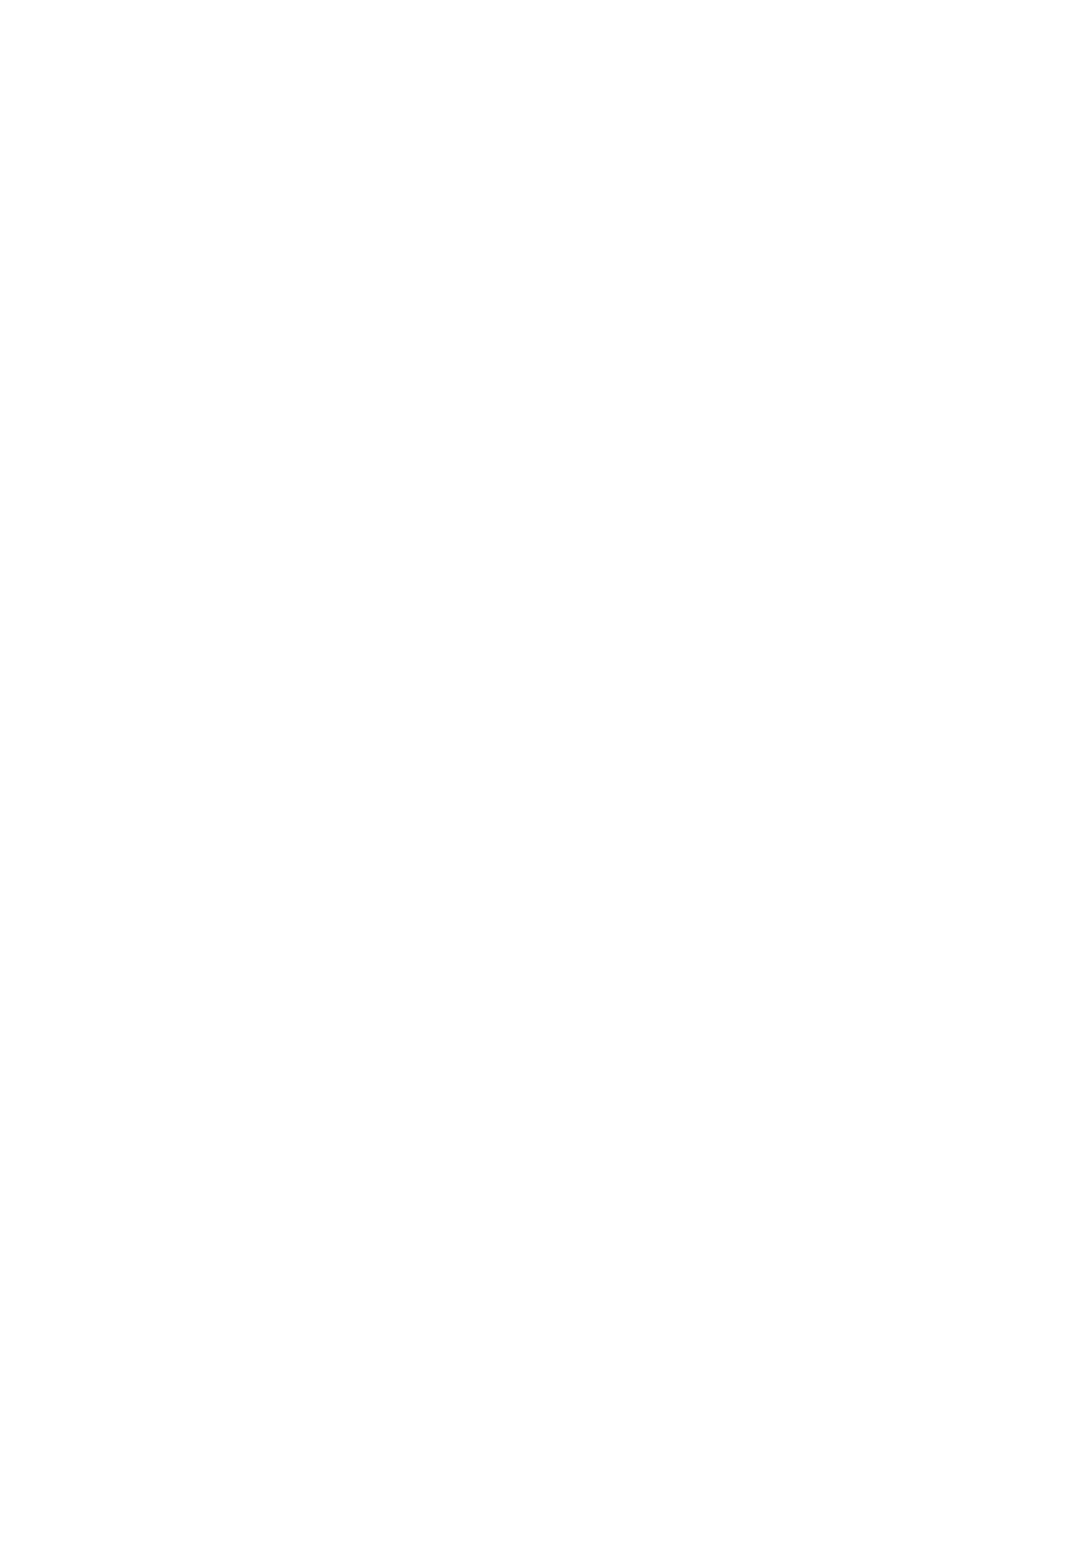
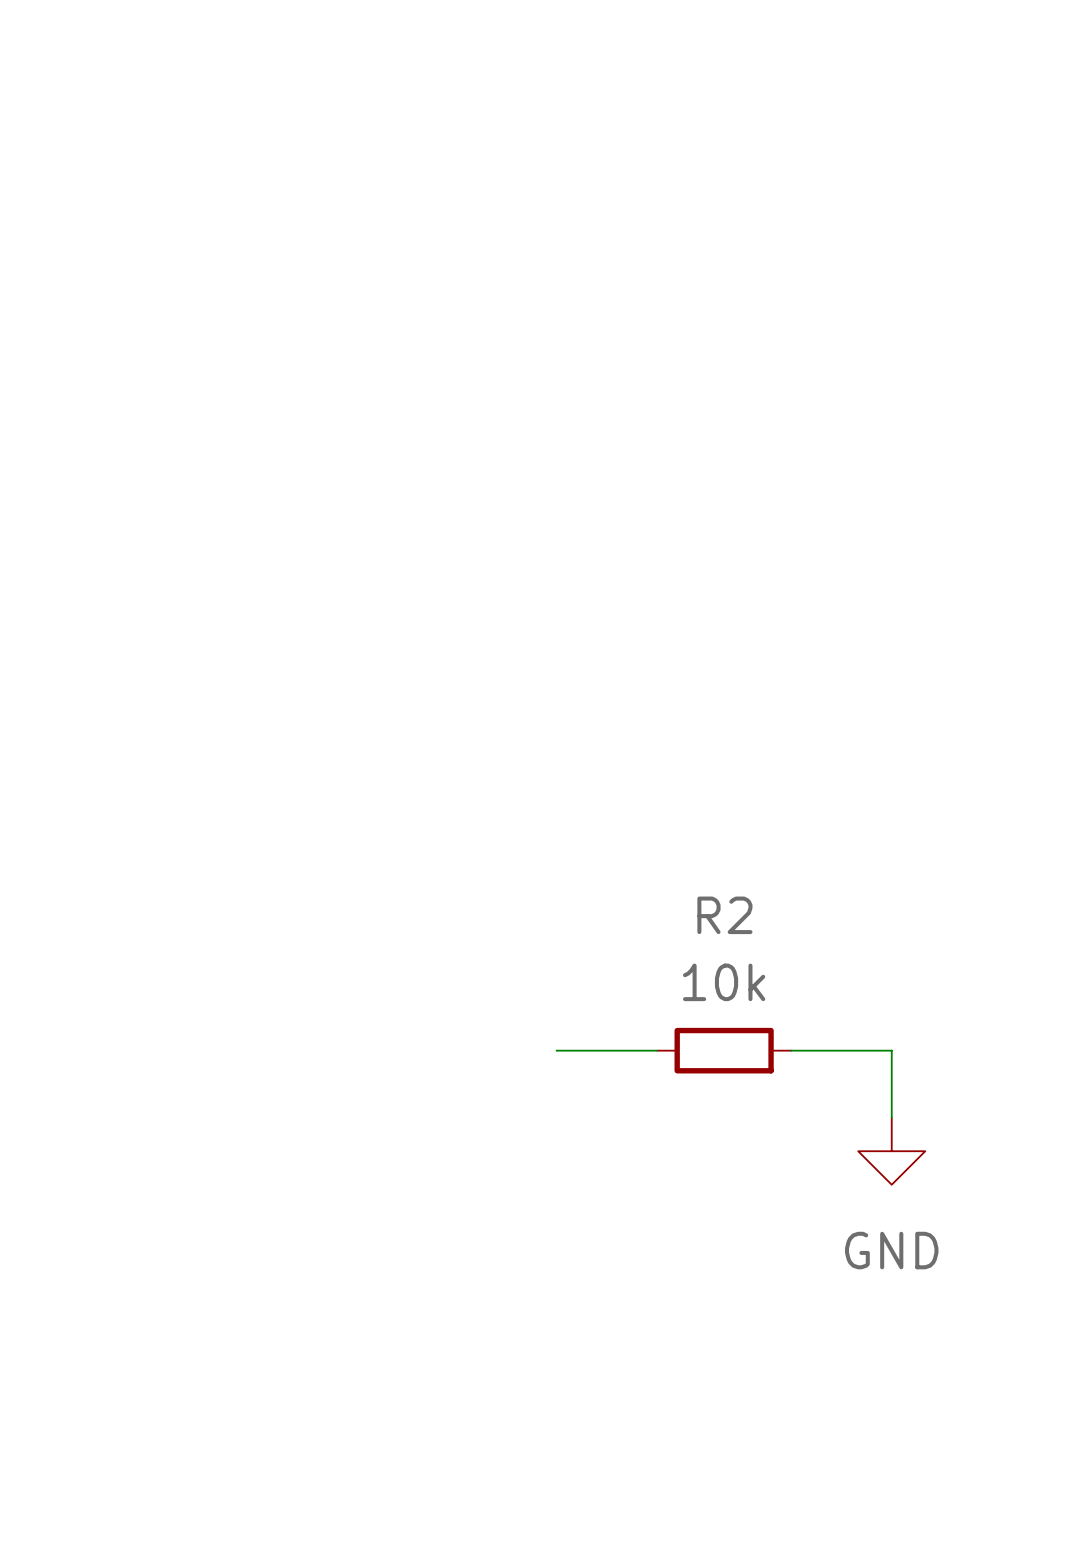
wire: none -> (556, 1050) (657, 1050)
R2: none -> 10k (724, 1050)
wire: none -> (791, 1050) (891, 1050) (891, 1117)
power symbol: none -> GND (891, 1151)

